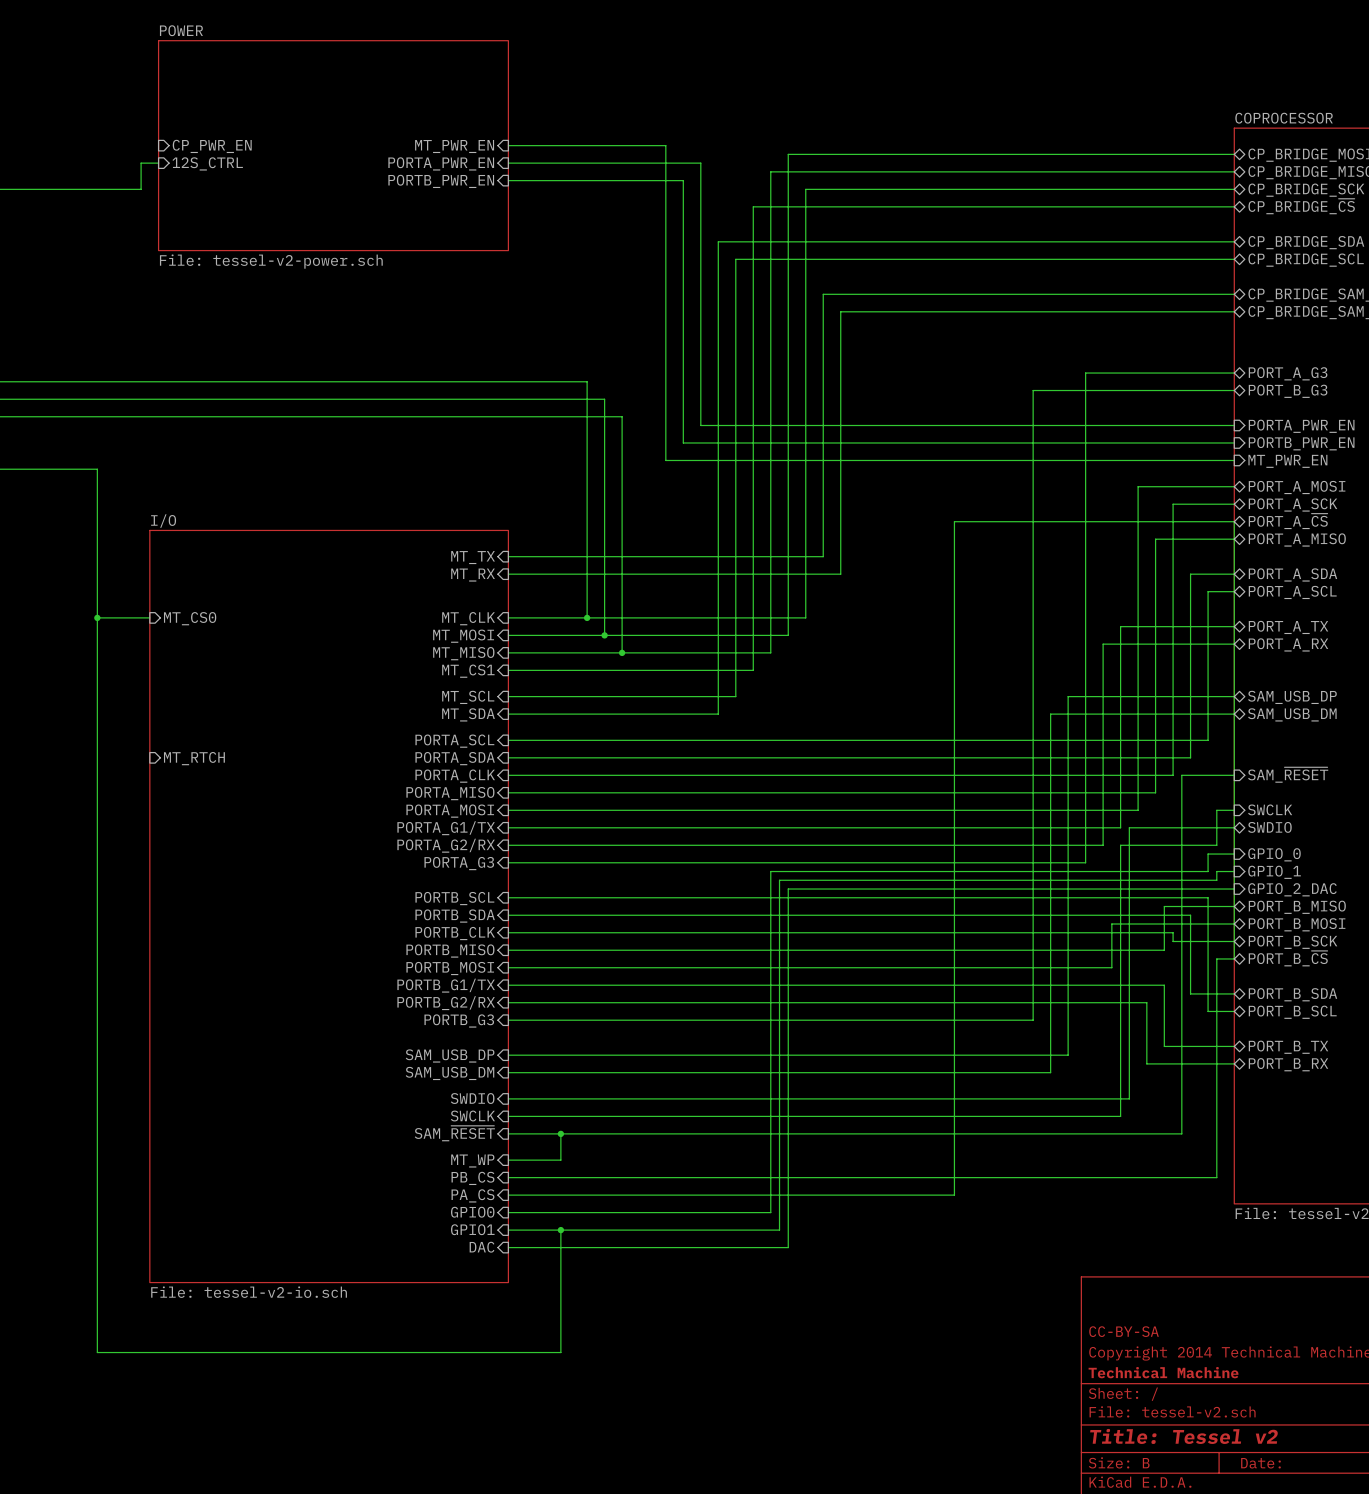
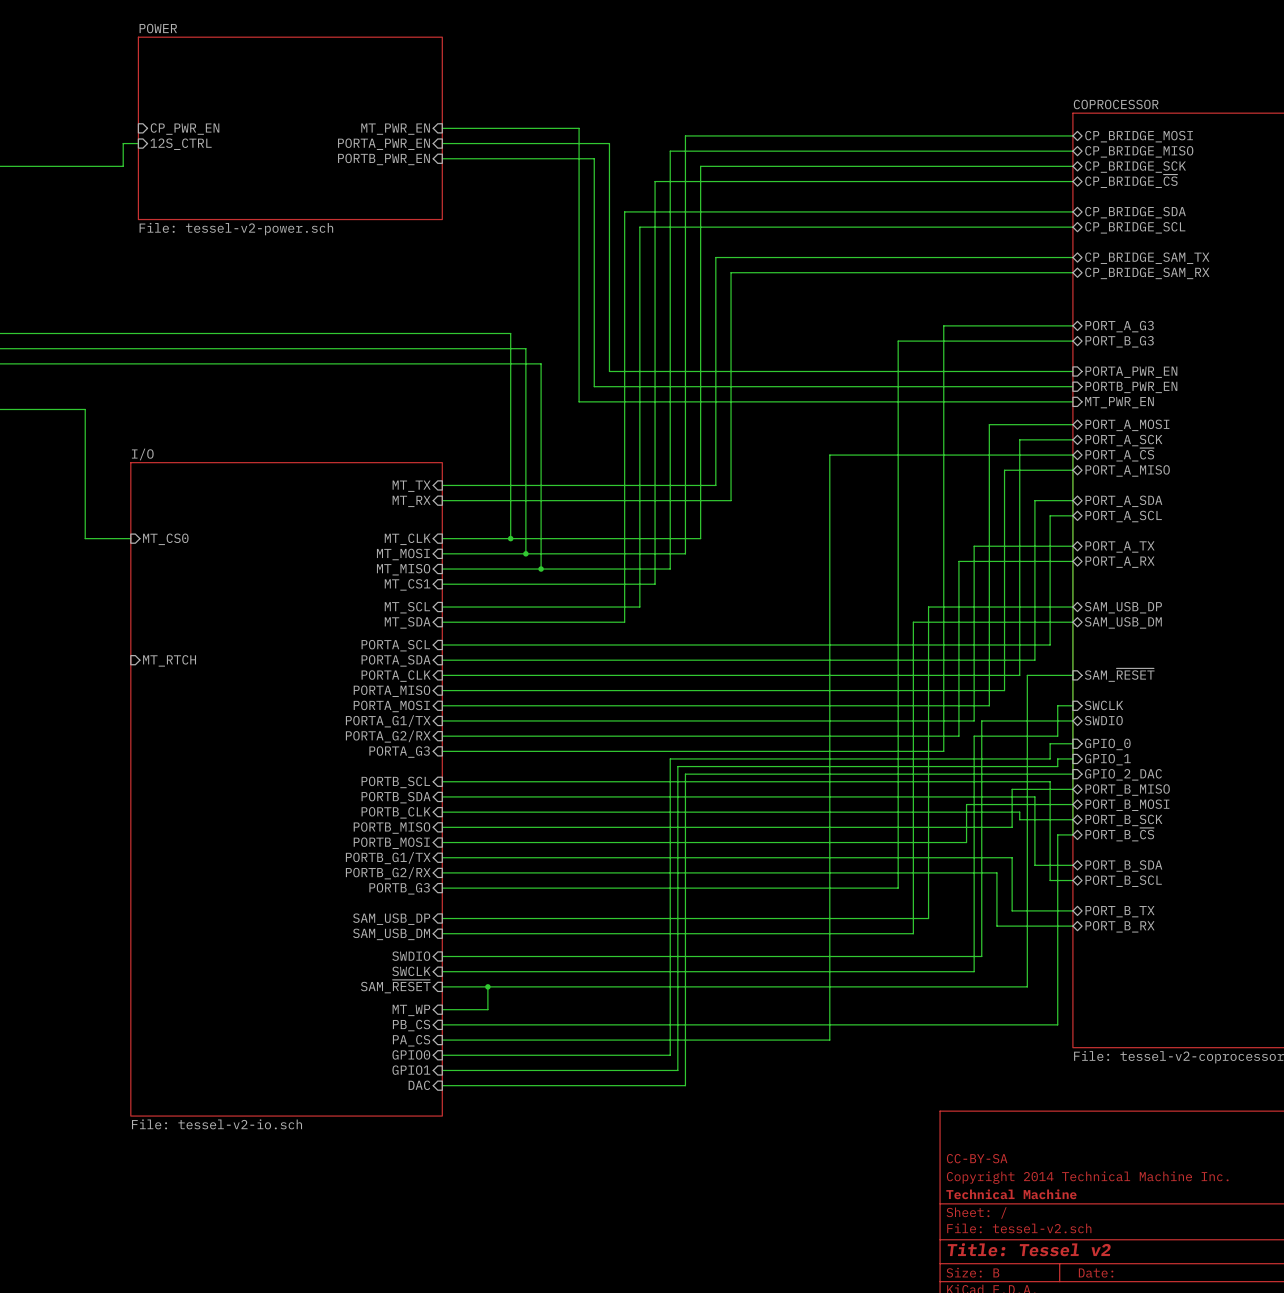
wire: (97, 617) (97, 1352) (560, 1352) (560, 1230) -> none
junction: (97, 617) -> none
junction: (560, 1230) -> none

